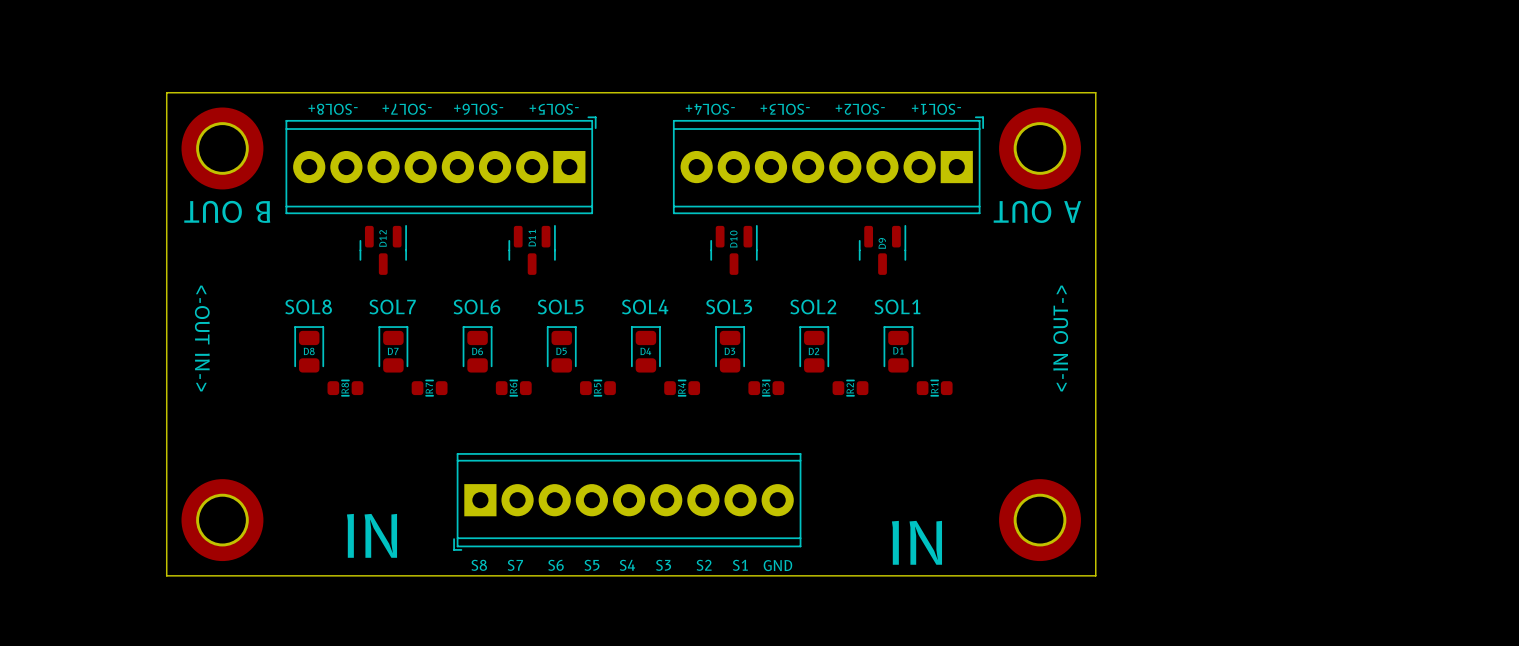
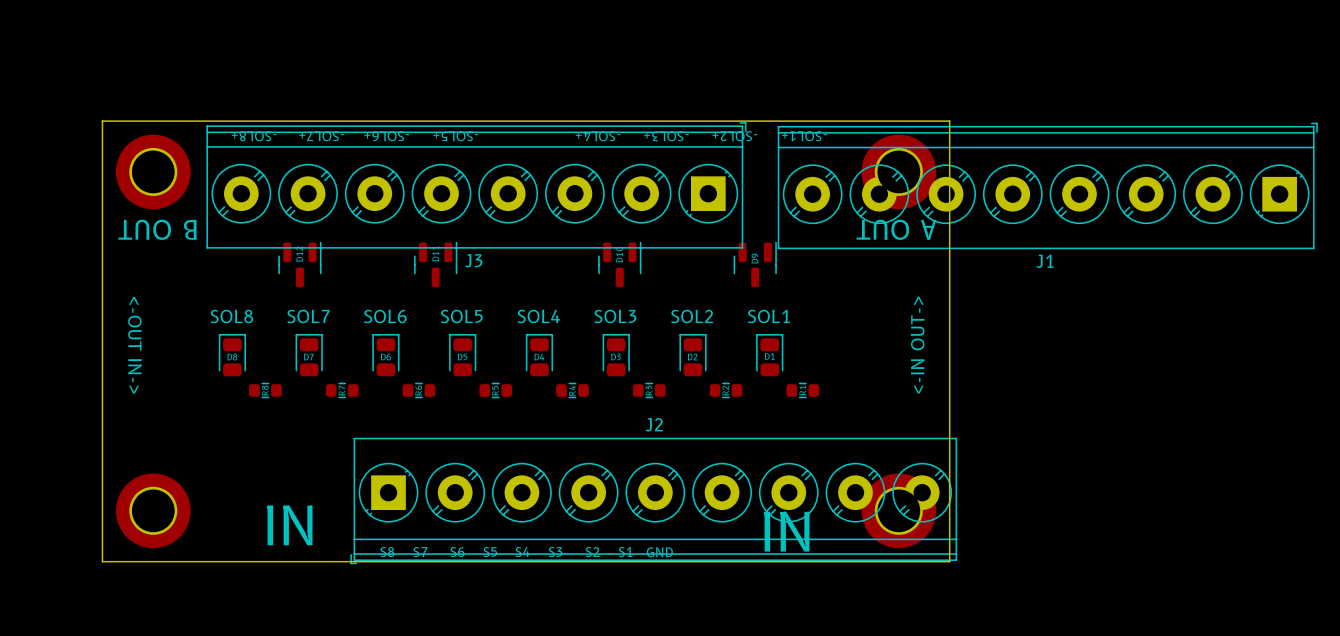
J3: none -> (476, 185)
J1: none -> (1047, 185)
part: (441, 165) -> none
part: (828, 165) -> none
part: (627, 501) -> none
J2: none -> (653, 500)

